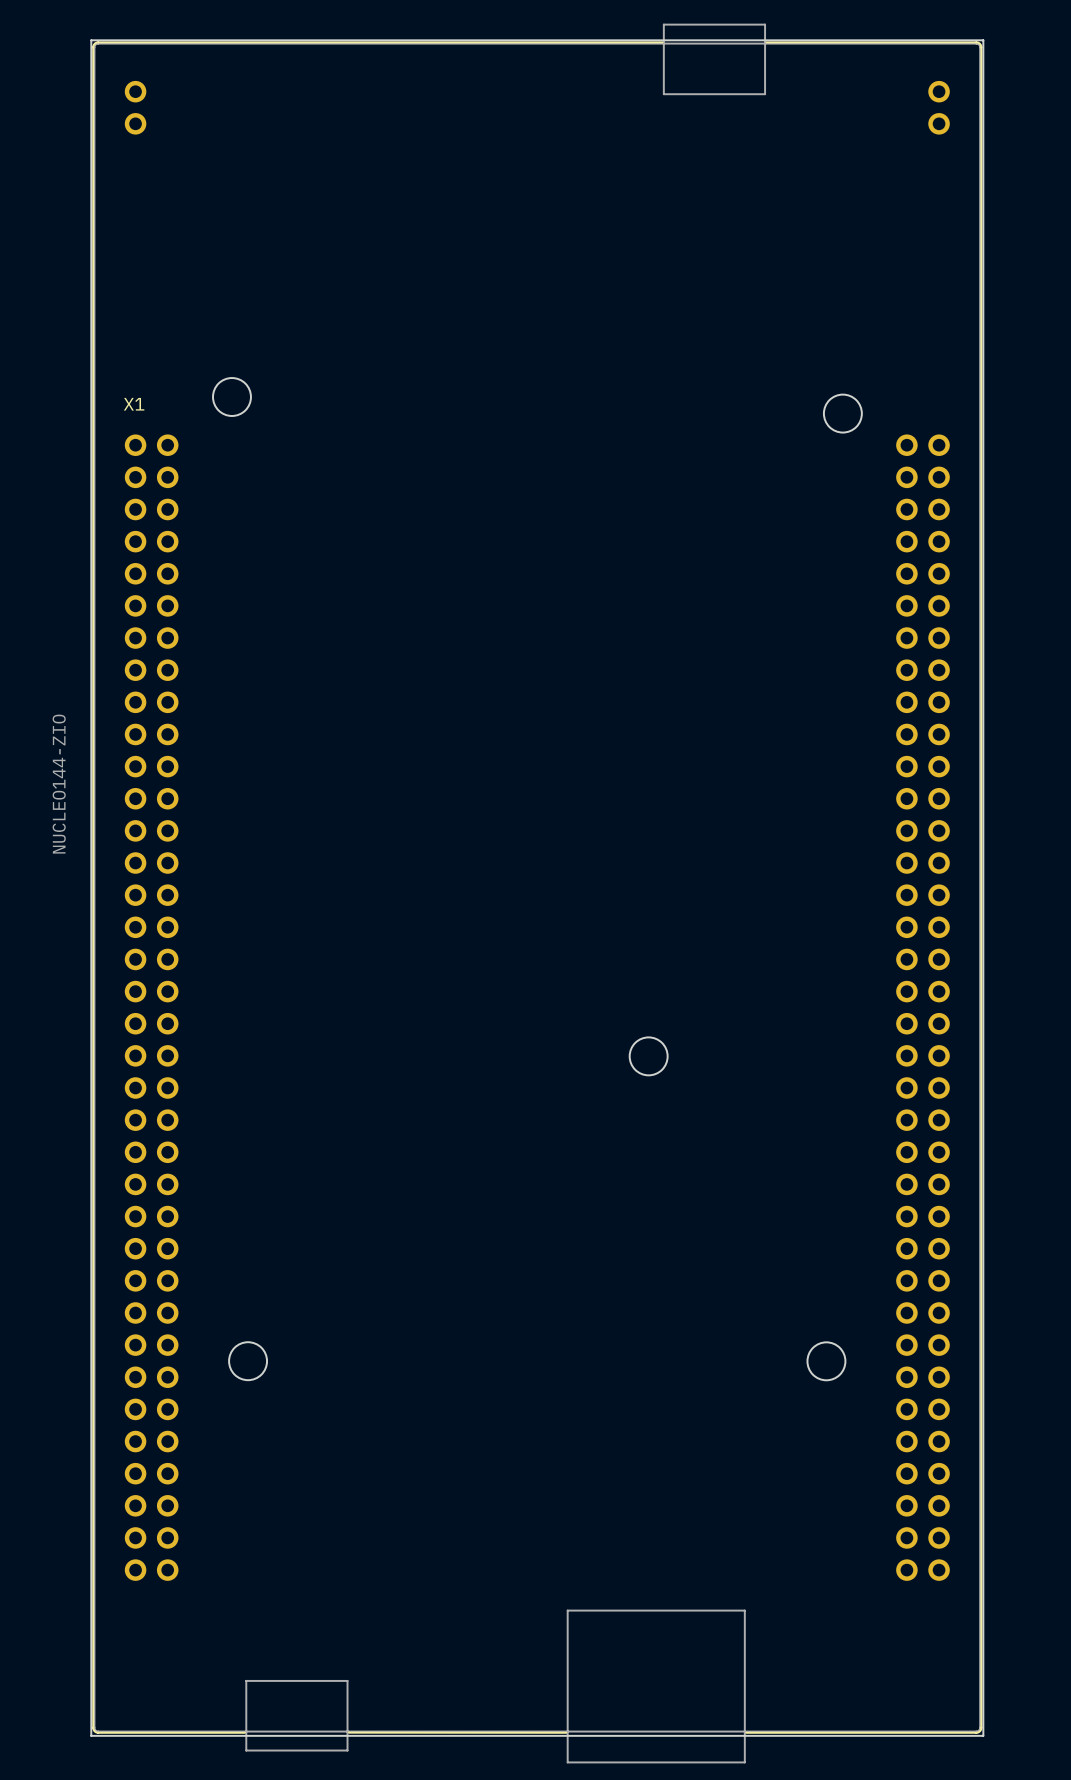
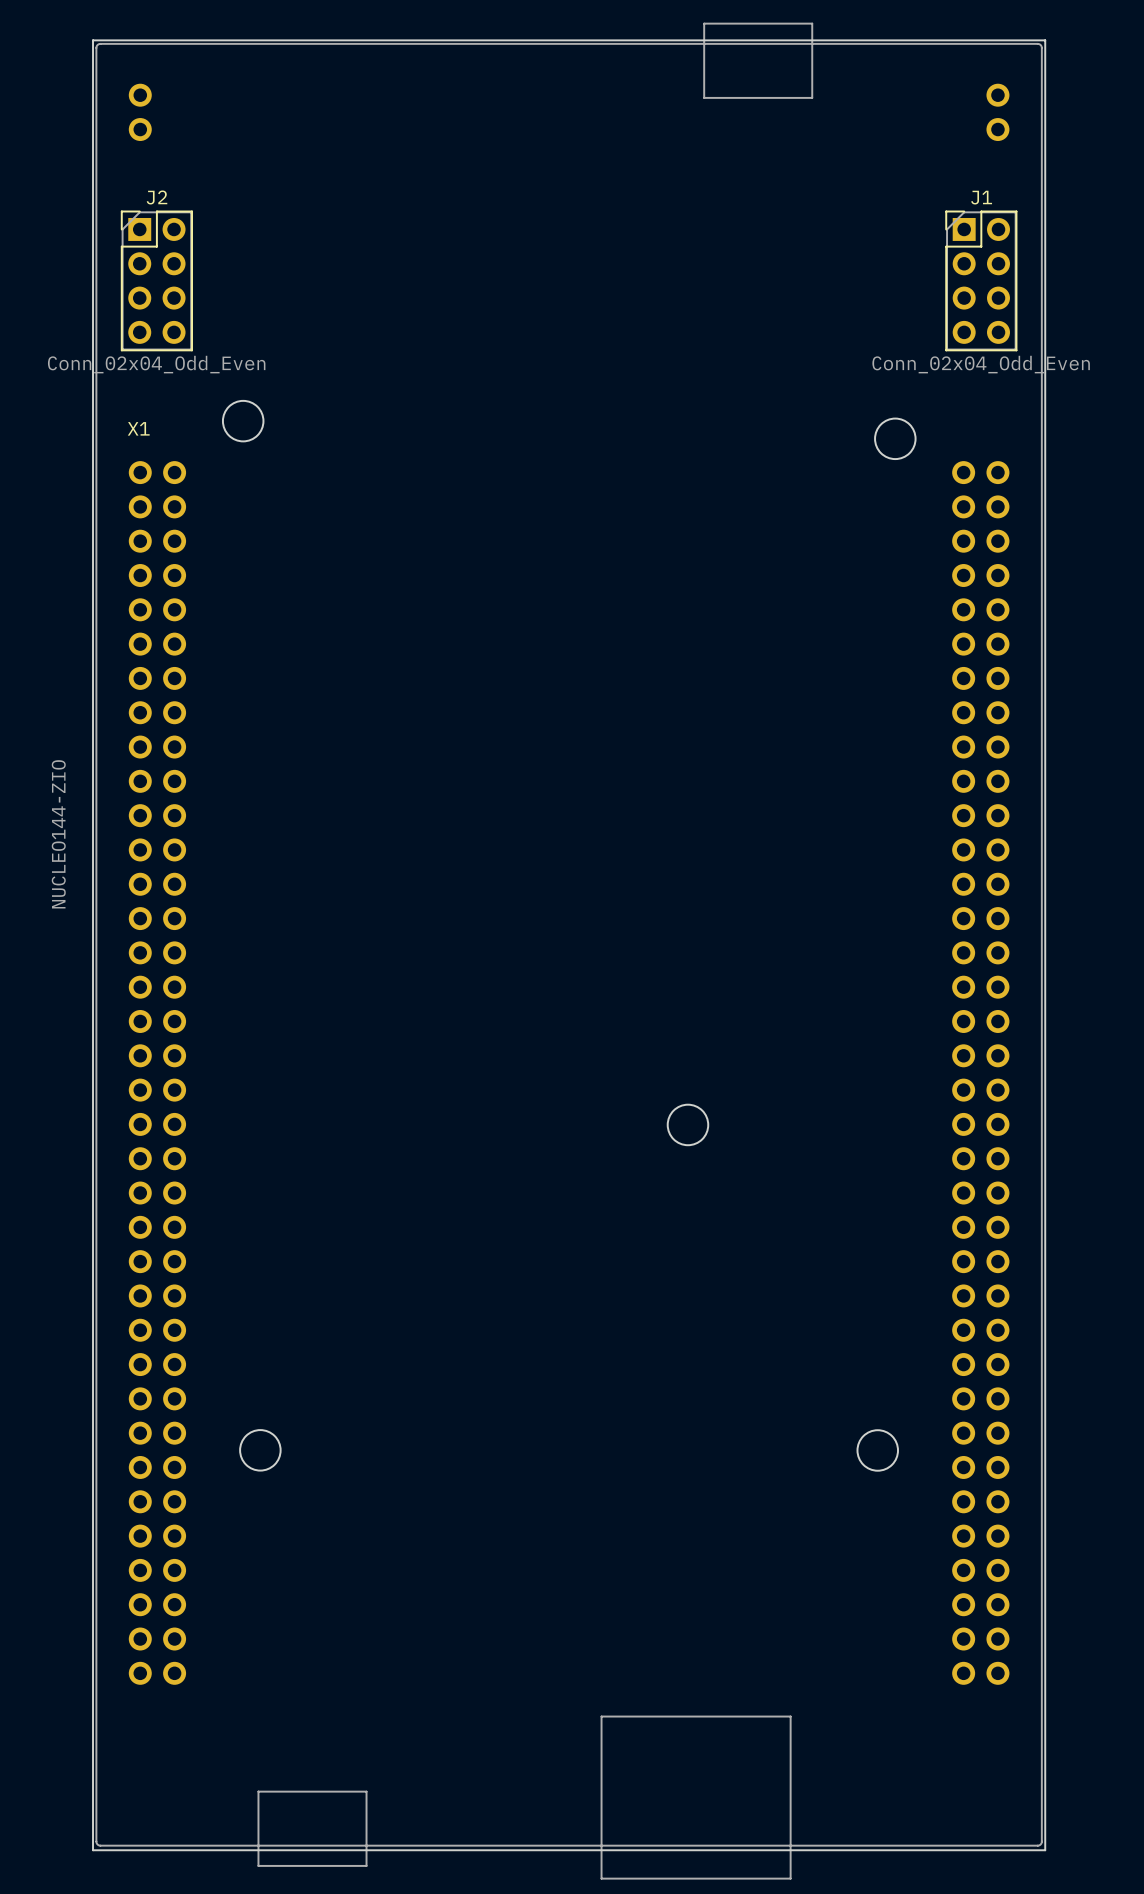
X1 footprint: [92, 23, 983, 1764] -> [95, 22, 1043, 1880]
J2: none -> Conn_02x04_Odd_Even (156, 280)
J1: none -> Conn_02x04_Odd_Even (981, 280)

